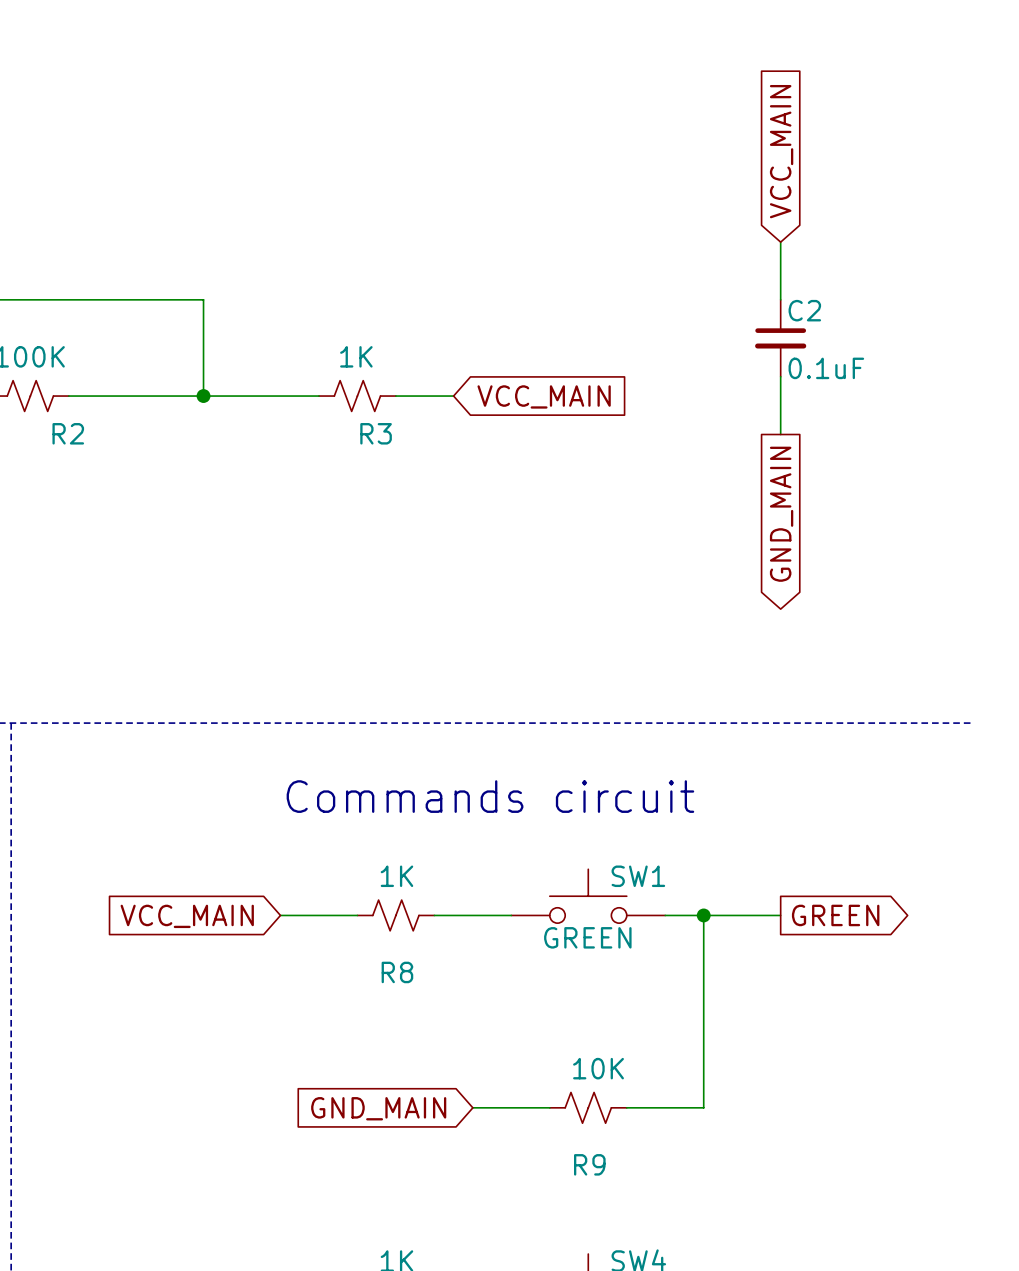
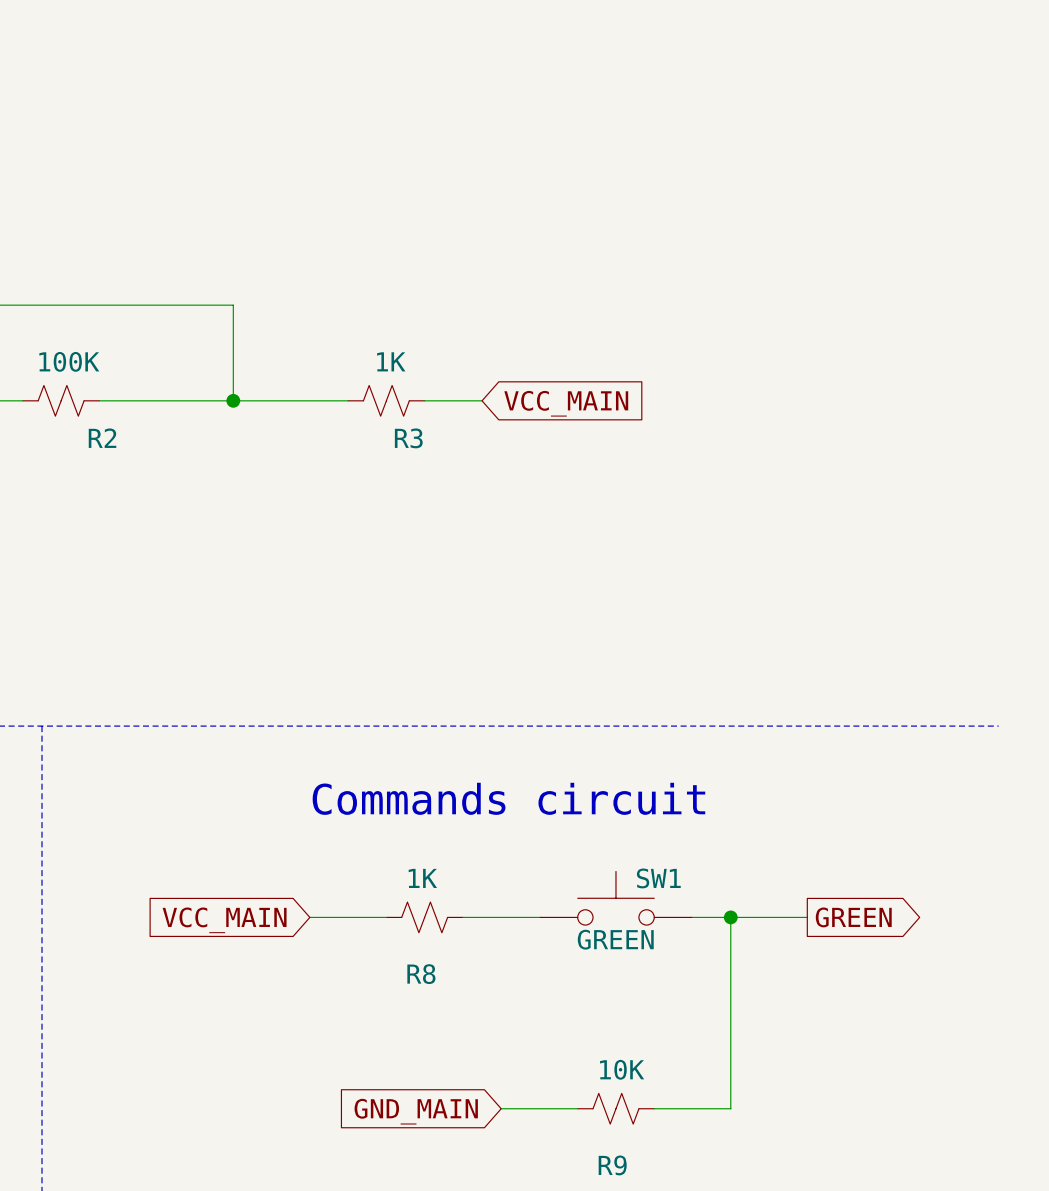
global label: VCC_MAIN (781, 151) -> none
wire: (780, 242) (780, 299) -> none
C2: 0.1uF (780, 338) -> none
wire: (780, 376) (780, 434) -> none
global label: GND_MAIN (781, 514) -> none

